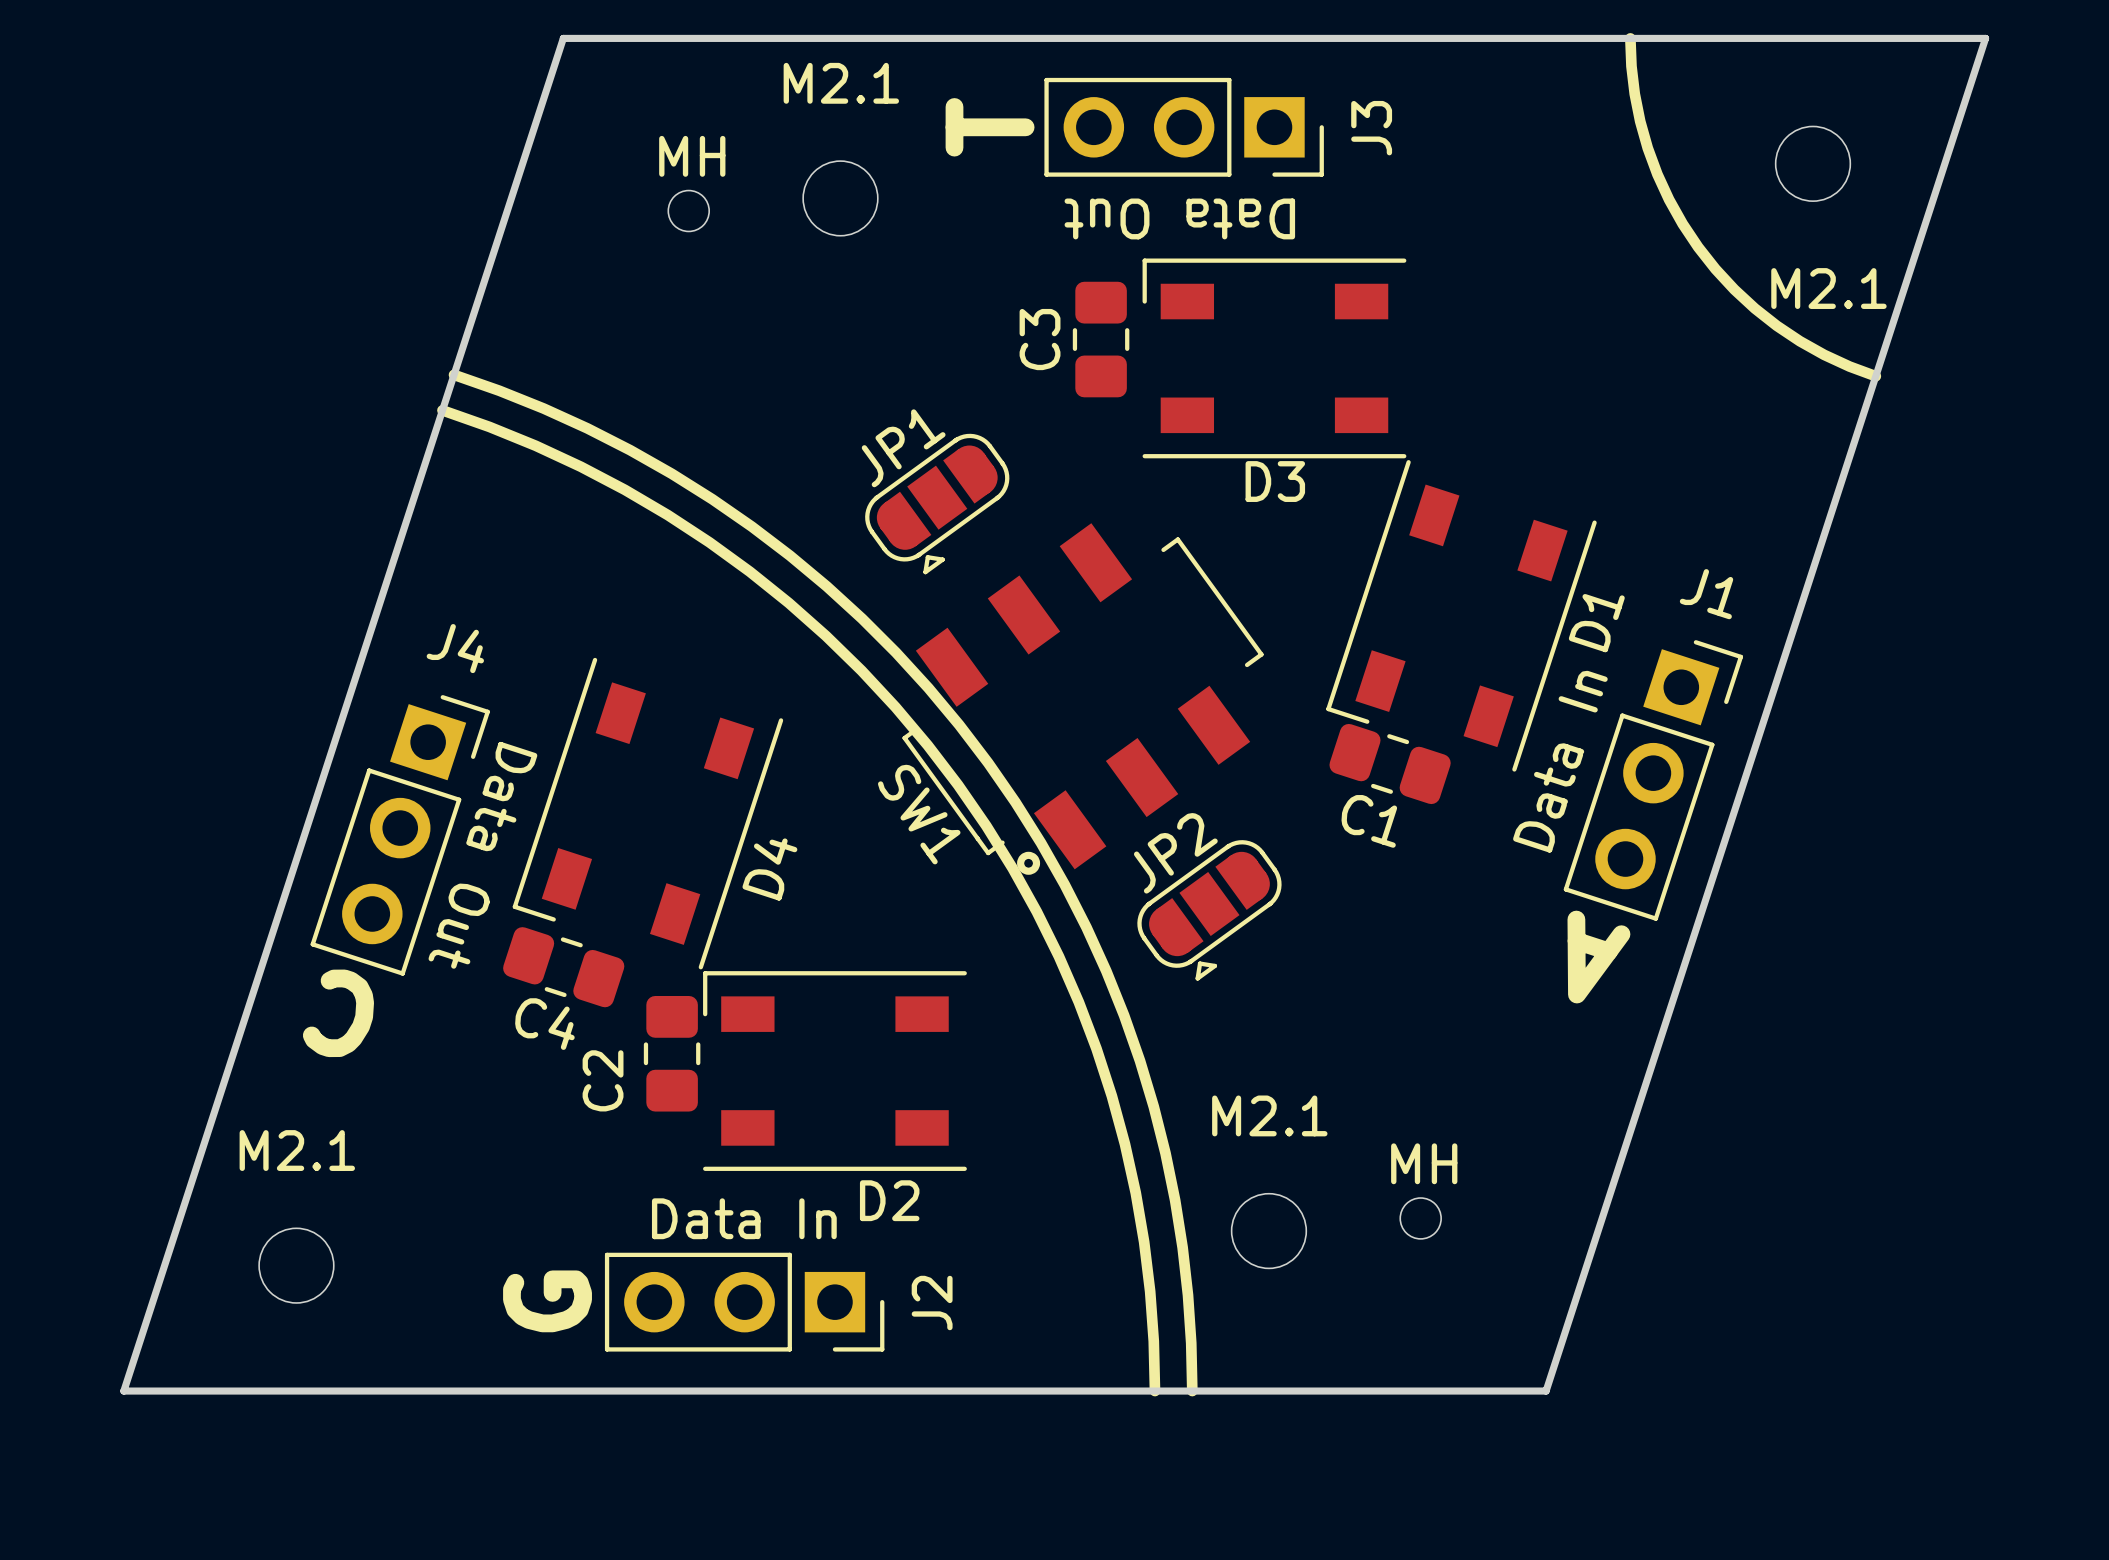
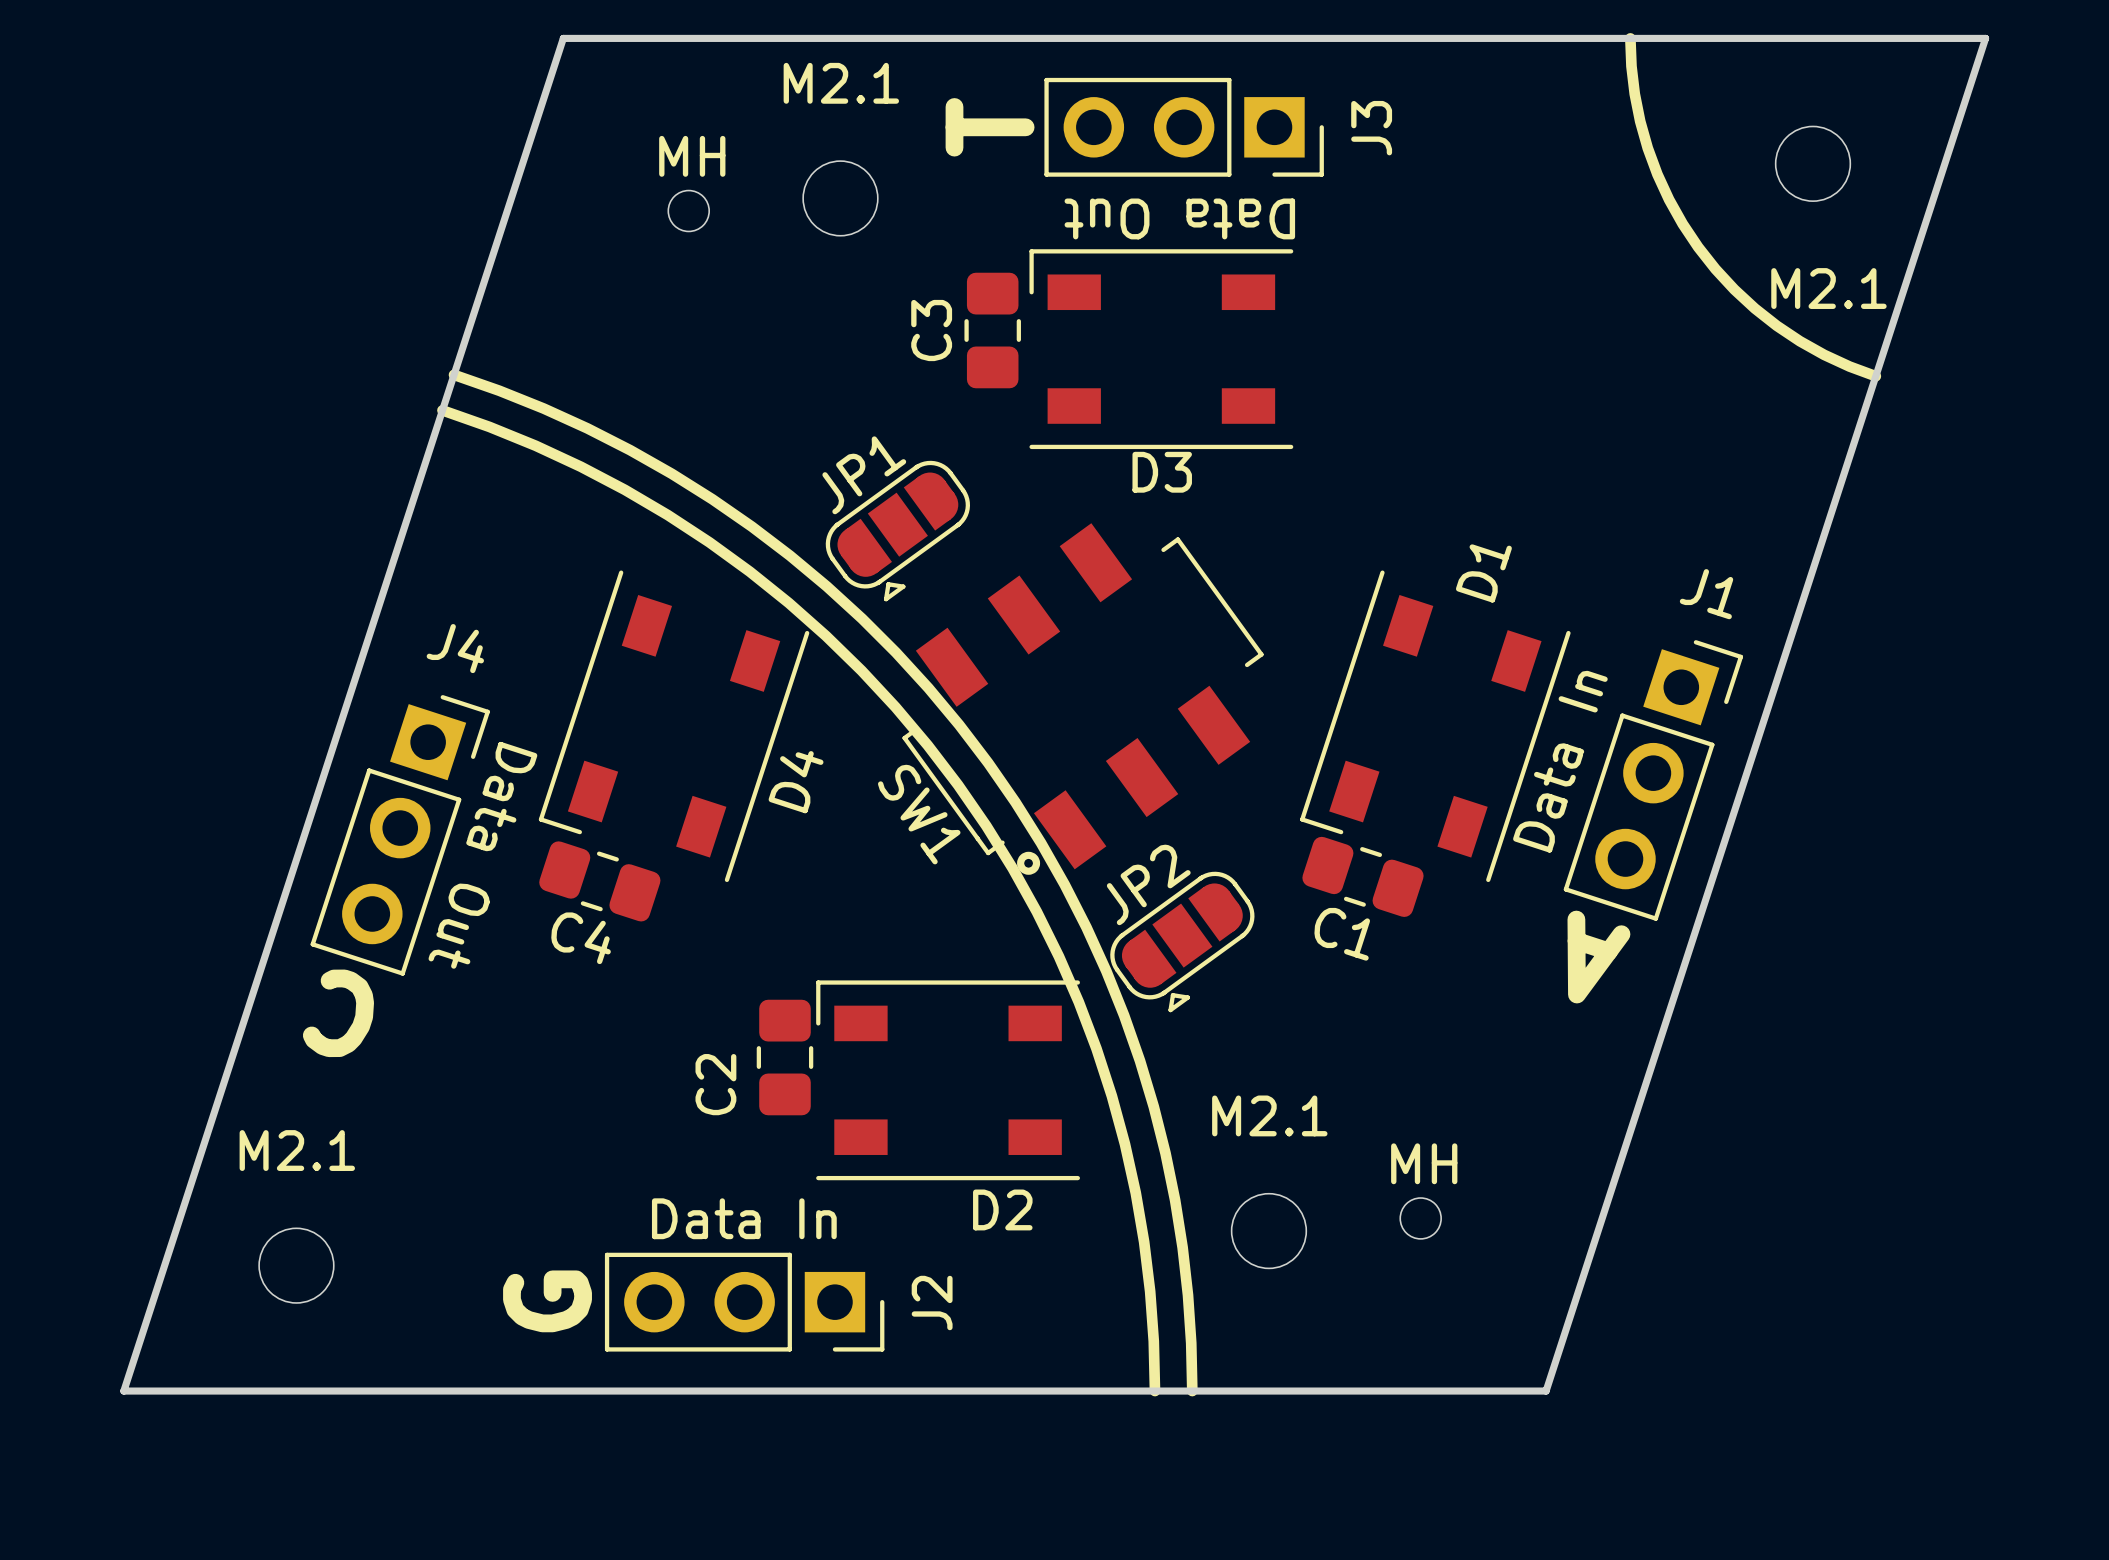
C3 position: (1101, 339) -> (992, 330)
D3 position: (1274, 358) -> (1161, 349)
JP1 position: (937, 504) -> (897, 531)
D1 position: (1461, 615) -> (1435, 726)
D1 name position: D1 (1596, 623) -> D1 (1483, 573)
C1 position: (1390, 764) -> (1362, 876)
D4 position: (647, 813) -> (674, 726)
JP2 position: (1209, 910) -> (1182, 941)
C4 position: (563, 967) -> (599, 881)
C2 position: (672, 1053) -> (784, 1057)
D2 position: (834, 1071) -> (948, 1080)

